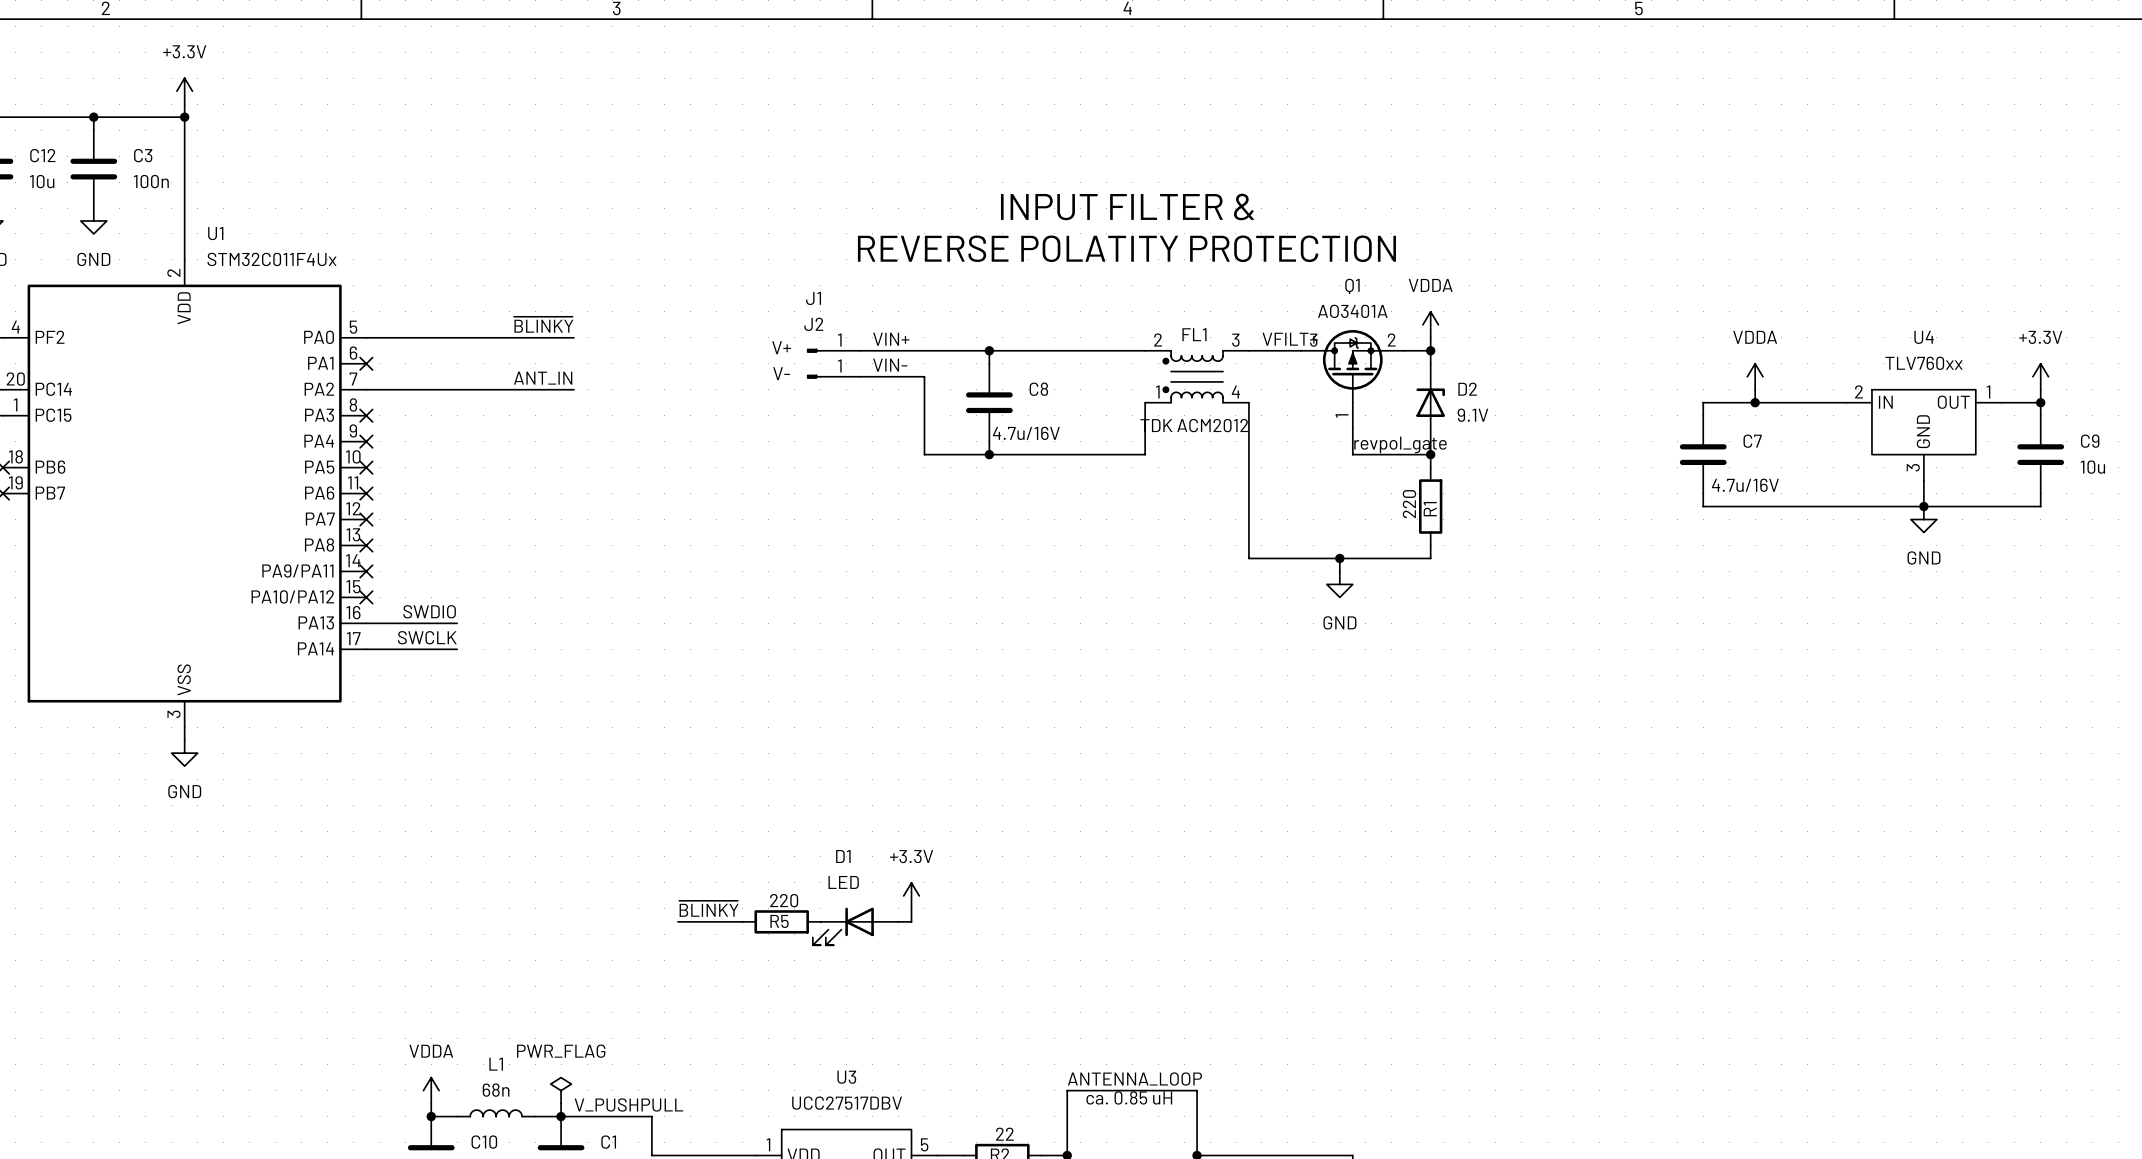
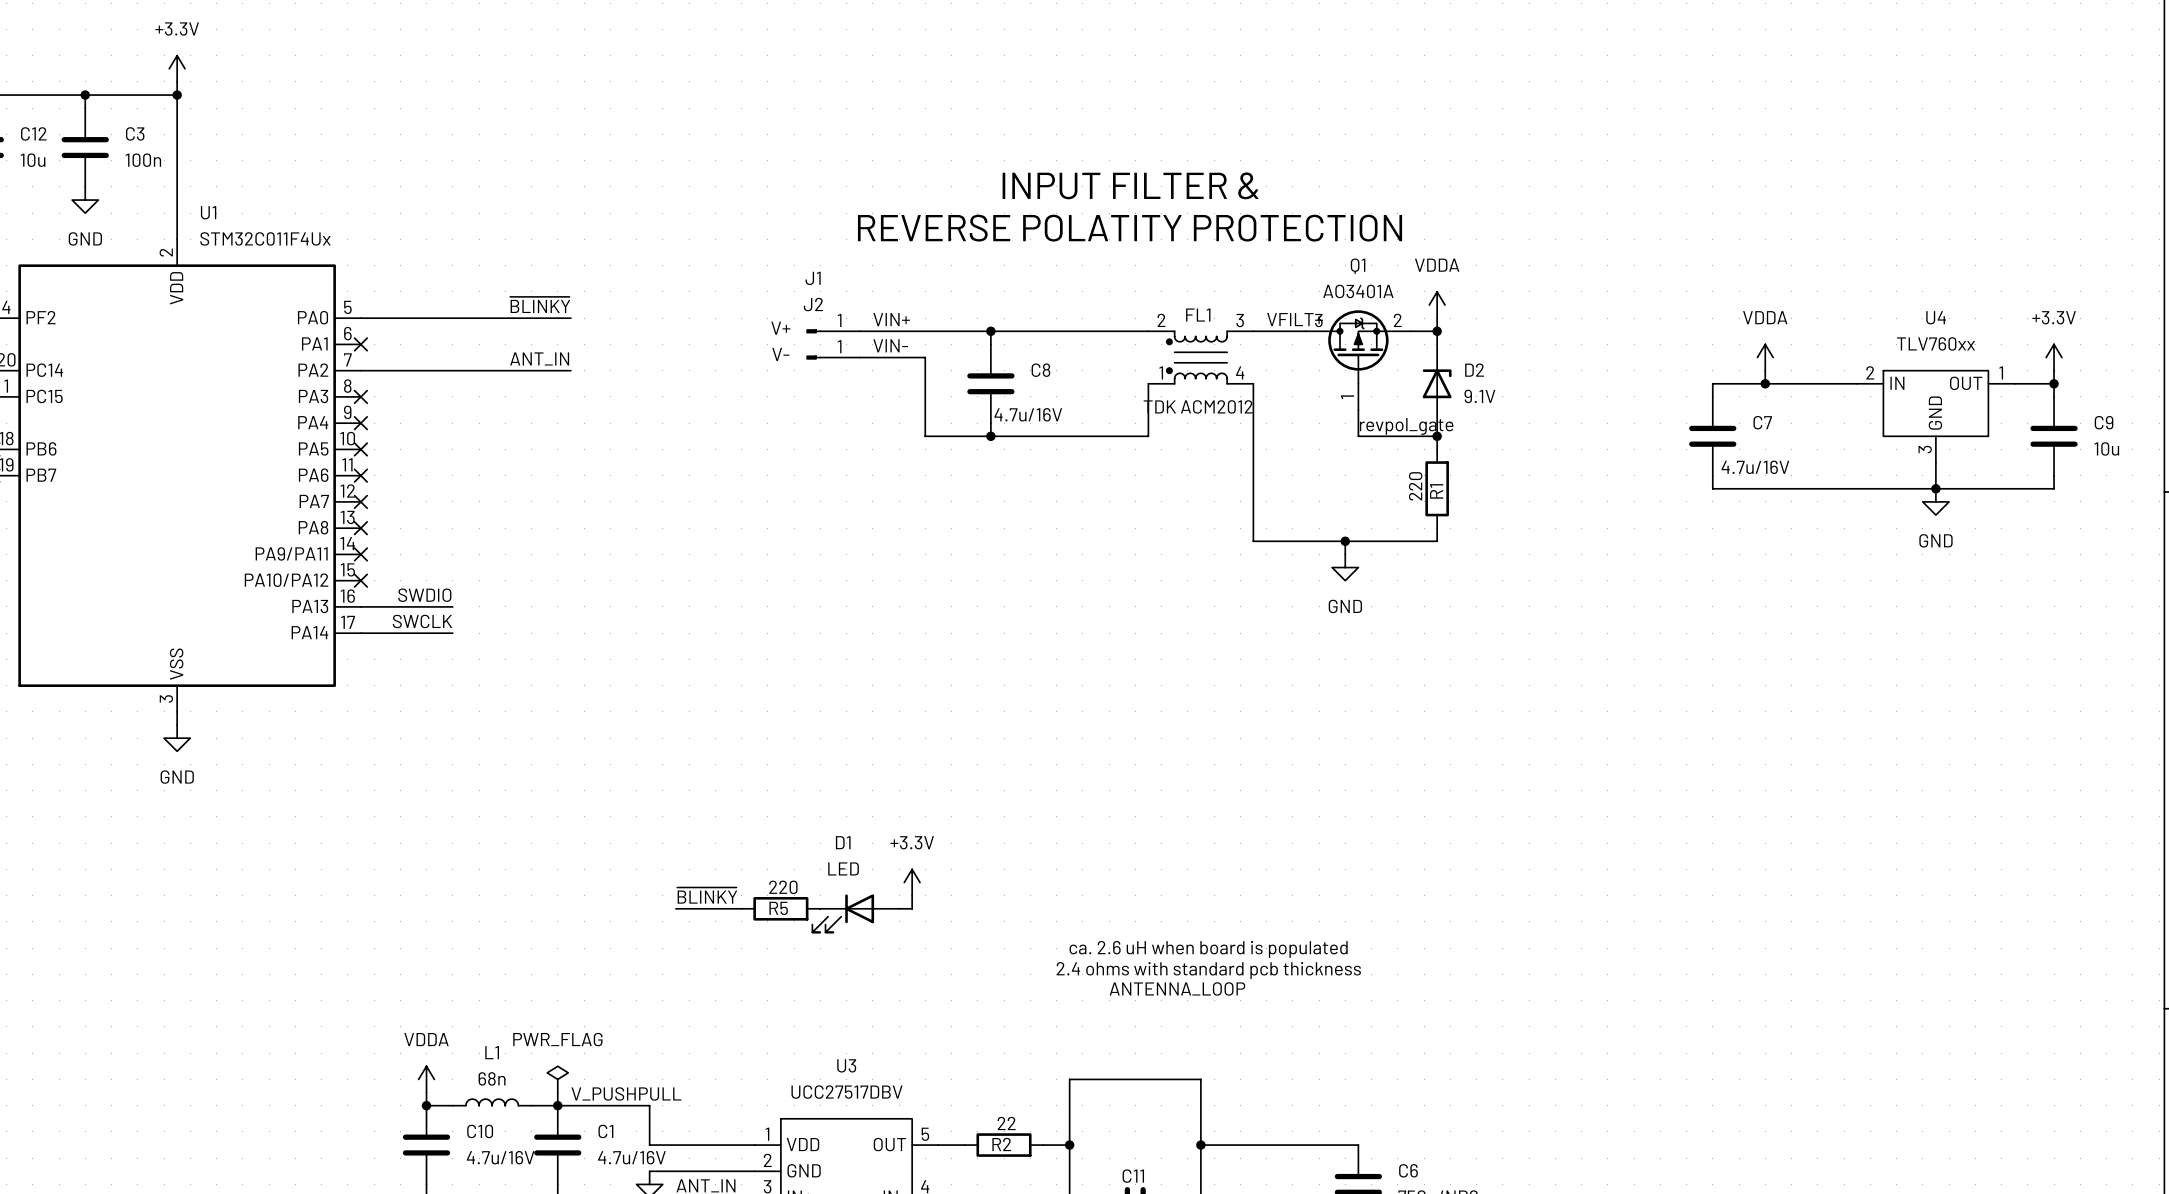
text: none -> ca. 2.6 uH when board is populated (1208, 949)
text: none -> 2.4 ohms with standard pcb thickness (1208, 970)
label position: ANTENNA_LOOP (1134, 1079) -> ANTENNA_LOOP (1177, 988)
text: ca. 0.85 uH (1129, 1097) -> none

